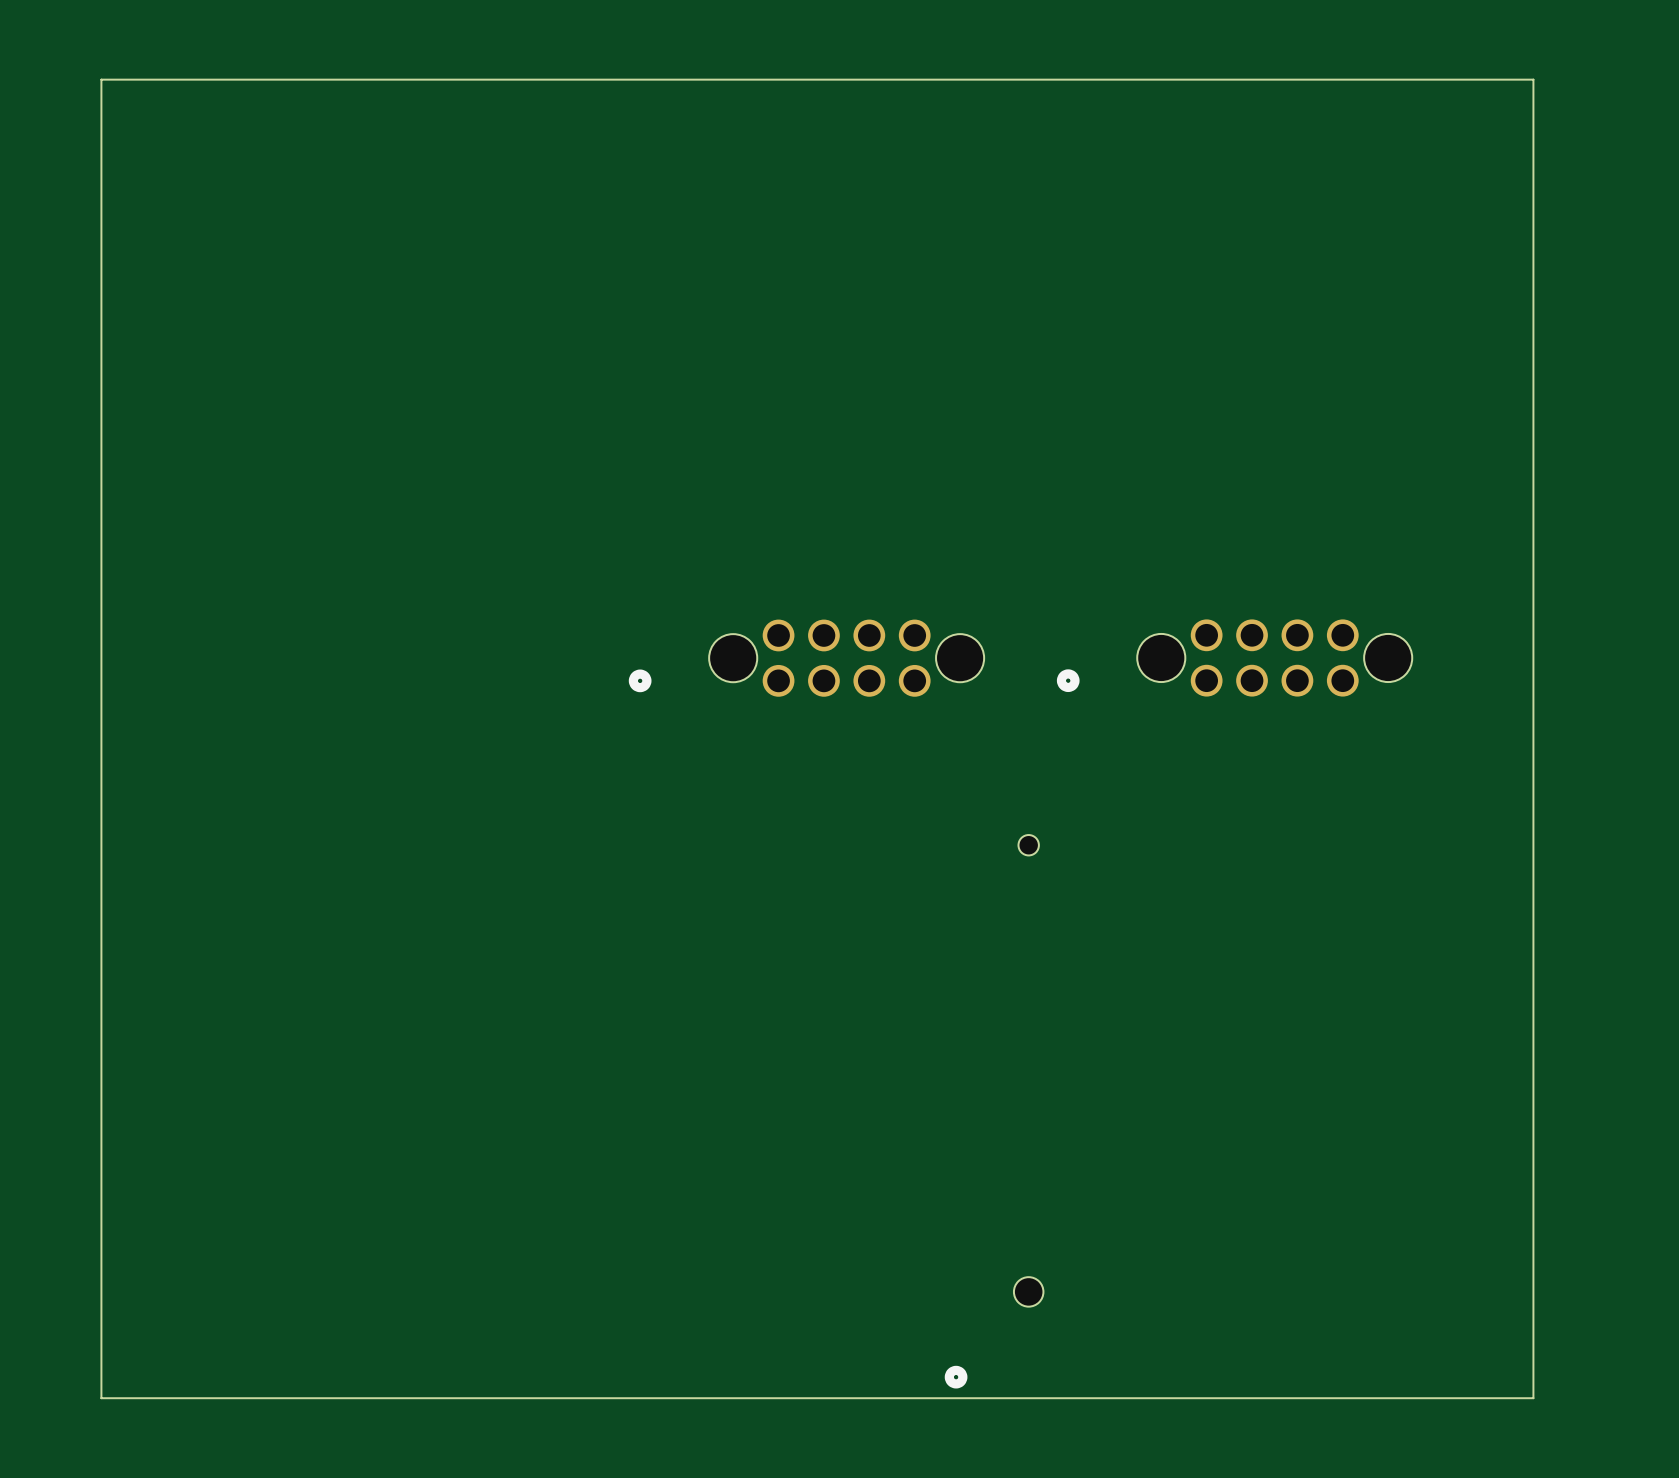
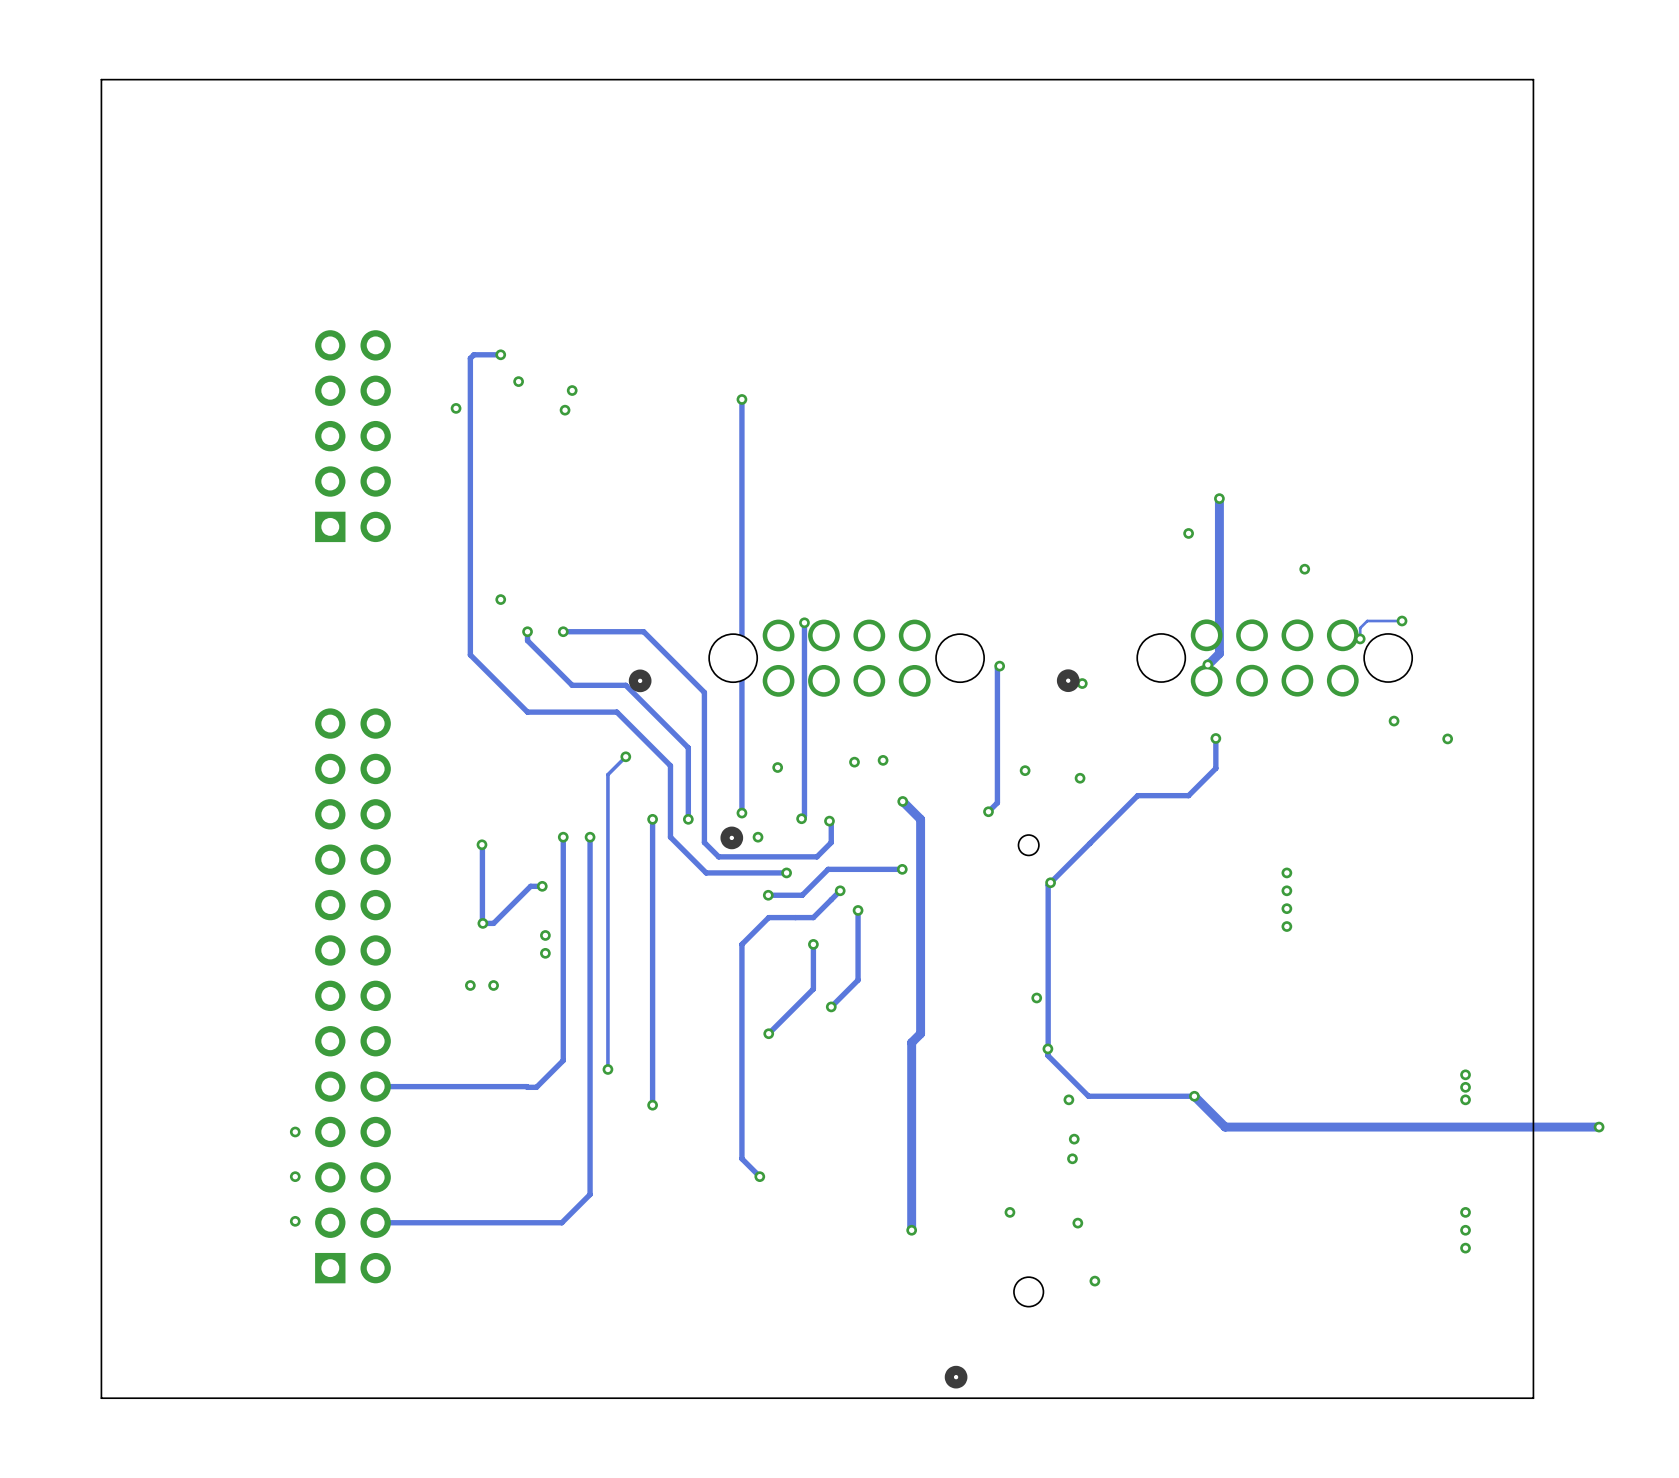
track: none -> (500, 354) (473, 354) (470, 358) (470, 654) (527, 712) (616, 712) (670, 765) (670, 837) (706, 872) (786, 872)
via: none -> (500, 354)
via: none -> (518, 381)
via: none -> (572, 390)
track: none -> (741, 399) (741, 813)
via: none -> (741, 399)
via: none -> (456, 408)
via: none -> (565, 410)
part: none -> (352, 436)
track: none -> (1219, 498) (1219, 653) (1207, 665)
via: none -> (1219, 498)
via: none -> (1188, 533)
via: none -> (1304, 569)
via: none -> (500, 599)
track: none -> (1402, 621) (1367, 621) (1360, 628) (1360, 638)
via: none -> (1402, 621)
track: none -> (804, 622) (804, 815) (801, 818)
via: none -> (804, 622)
track: none -> (527, 631) (527, 640) (572, 685) (625, 685) (688, 747) (688, 819)
via: none -> (527, 631)
track: none -> (563, 631) (643, 631) (704, 692) (704, 842) (718, 856) (816, 856) (831, 842) (831, 822) (829, 821)
via: none -> (563, 631)
via: none -> (1360, 638)
via: none -> (1207, 664)
track: none -> (999, 666) (997, 668) (997, 802) (988, 811)
via: none -> (999, 666)
via: none -> (1082, 683)
via: none -> (1394, 721)
track: none -> (1215, 738) (1215, 768) (1188, 795) (1137, 795) (1048, 885) (1047, 1055) (1088, 1096) (1194, 1096) (1225, 1127) (1599, 1127)
via: none -> (1215, 738)
via: none -> (1447, 738)
track: none -> (625, 756) (607, 774) (607, 1069)
via: none -> (625, 756)
via: none -> (883, 760)
via: none -> (854, 762)
via: none -> (777, 767)
via: none -> (1025, 770)
via: none -> (1080, 778)
track: none -> (902, 801) (920, 819) (920, 1033) (911, 1042) (911, 1230)
via: none -> (902, 801)
via: none -> (988, 811)
via: none -> (741, 813)
via: none -> (801, 818)
track: none -> (652, 819) (652, 1105)
via: none -> (652, 819)
via: none -> (688, 819)
via: none -> (829, 821)
track: none -> (563, 837) (563, 1060) (536, 1087) (375, 1086)
via: none -> (563, 837)
track: none -> (590, 837) (590, 1194) (561, 1222) (375, 1222)
via: none -> (590, 837)
part: none -> (731, 837)
via: none -> (758, 837)
track: none -> (481, 844) (482, 923) (493, 923) (530, 886) (542, 886)
via: none -> (481, 844)
track: none -> (902, 869) (828, 869) (802, 895) (768, 895)
via: none -> (902, 869)
via: none -> (786, 872)
via: none -> (1286, 872)
via: none -> (1050, 882)
via: none -> (542, 886)
track: none -> (840, 890) (813, 917) (768, 917) (741, 944) (741, 1158) (759, 1176)
via: none -> (840, 890)
via: none -> (1286, 890)
via: none -> (768, 895)
via: none -> (1286, 908)
track: none -> (858, 910) (858, 980) (831, 1006)
via: none -> (858, 910)
via: none -> (482, 923)
via: none -> (1286, 926)
via: none -> (545, 935)
track: none -> (813, 944) (813, 989) (768, 1033)
via: none -> (813, 944)
via: none -> (545, 953)
via: none -> (470, 985)
via: none -> (493, 985)
part: none -> (352, 995)
via: none -> (1036, 997)
via: none -> (831, 1006)
via: none -> (768, 1033)
via: none -> (1047, 1048)
via: none -> (607, 1069)
via: none -> (1465, 1074)
via: none -> (1465, 1087)
via: none -> (1194, 1096)
via: none -> (1068, 1099)
via: none -> (1465, 1099)
via: none -> (652, 1105)
via: none -> (1599, 1127)
via: none -> (295, 1131)
via: none -> (1074, 1139)
via: none -> (1072, 1158)
via: none -> (295, 1176)
via: none -> (759, 1176)
via: none -> (1009, 1212)
via: none -> (1465, 1212)
via: none -> (295, 1221)
via: none -> (1077, 1223)
via: none -> (911, 1230)
via: none -> (1465, 1230)
via: none -> (1465, 1248)
via: none -> (1094, 1281)

